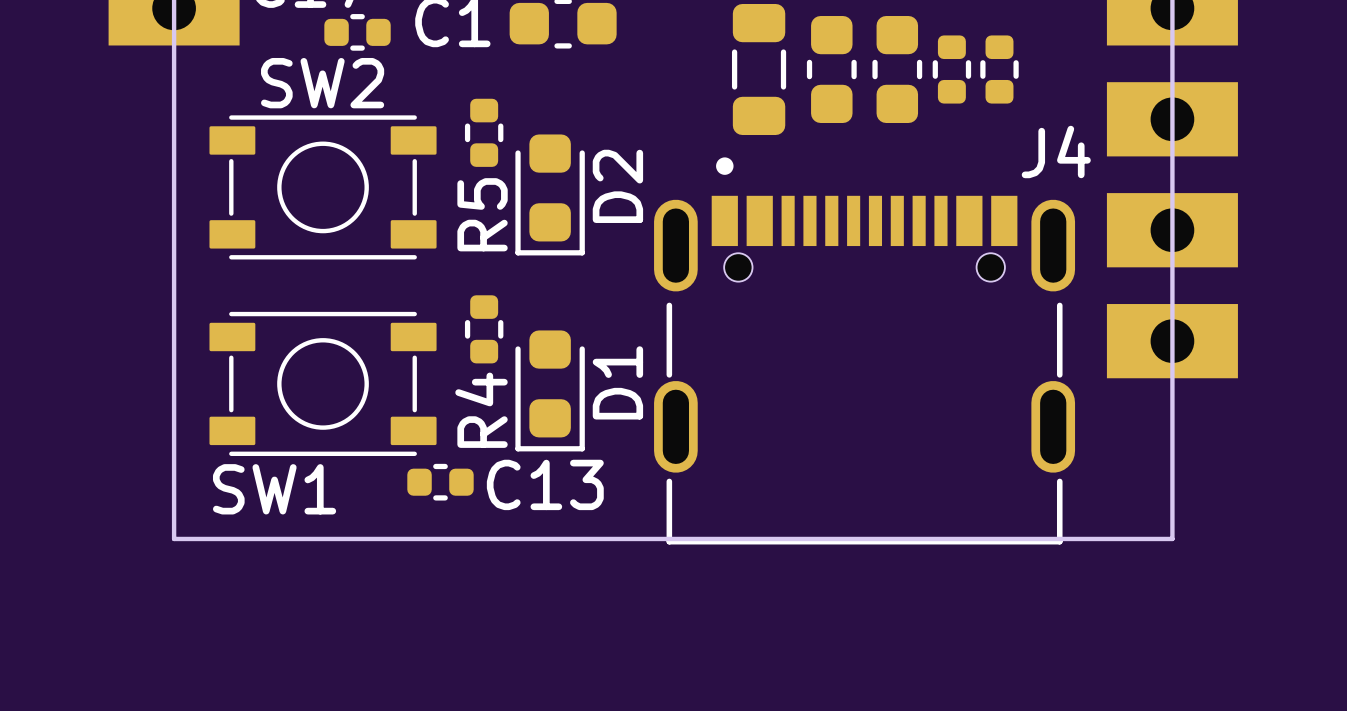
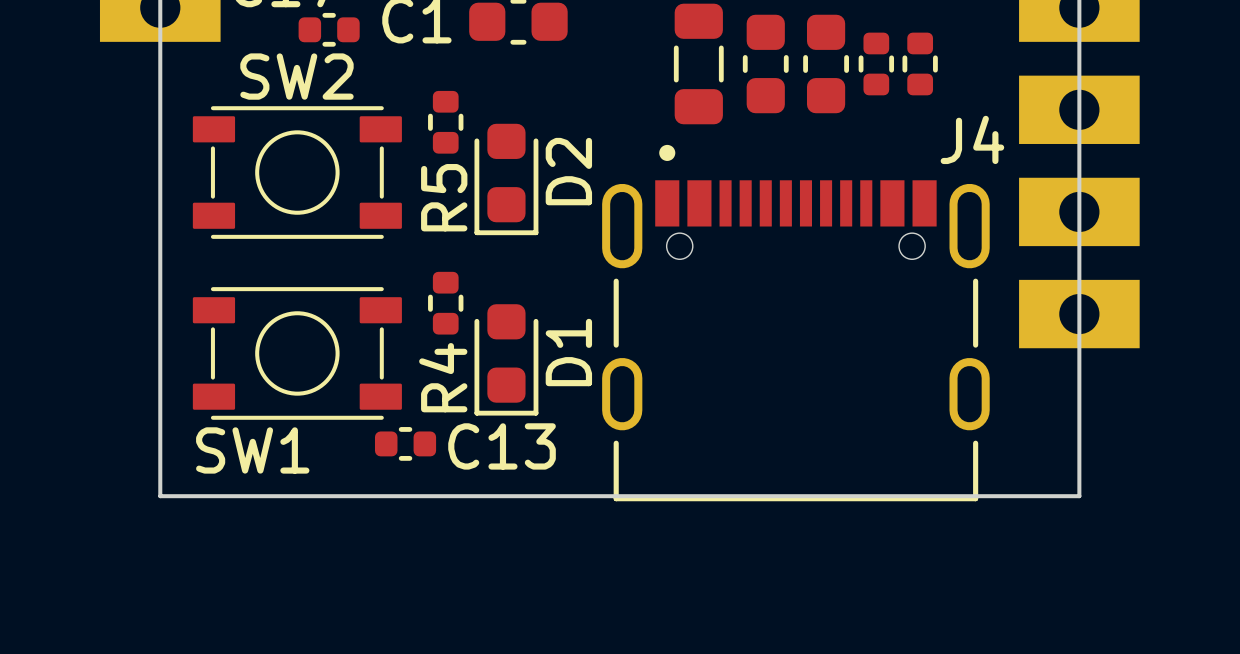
J4 footprint: [654, 157, 1076, 545] -> [602, 144, 990, 502]

